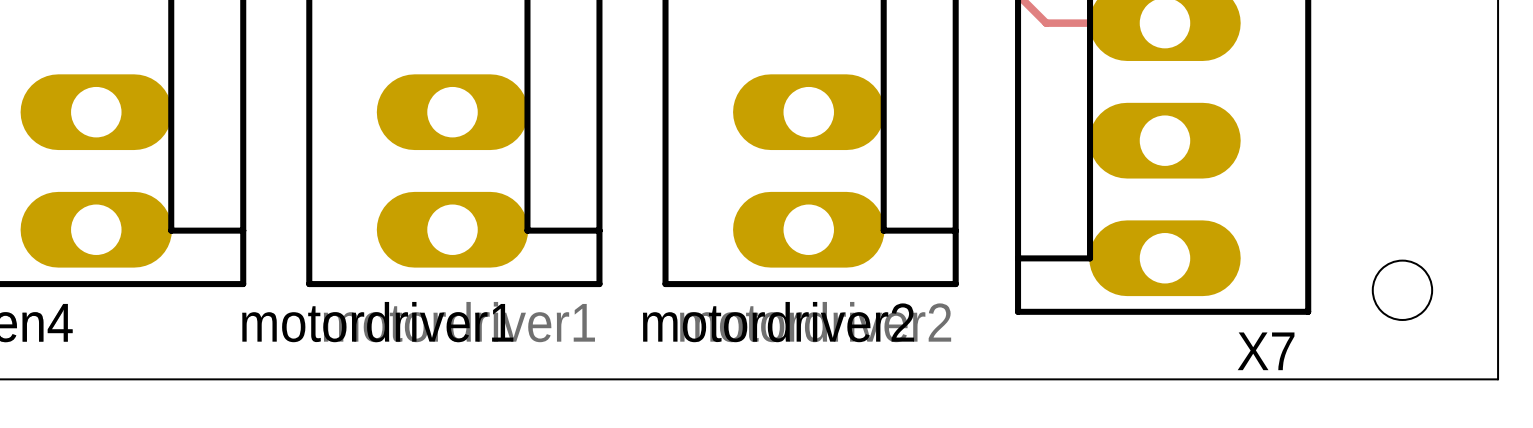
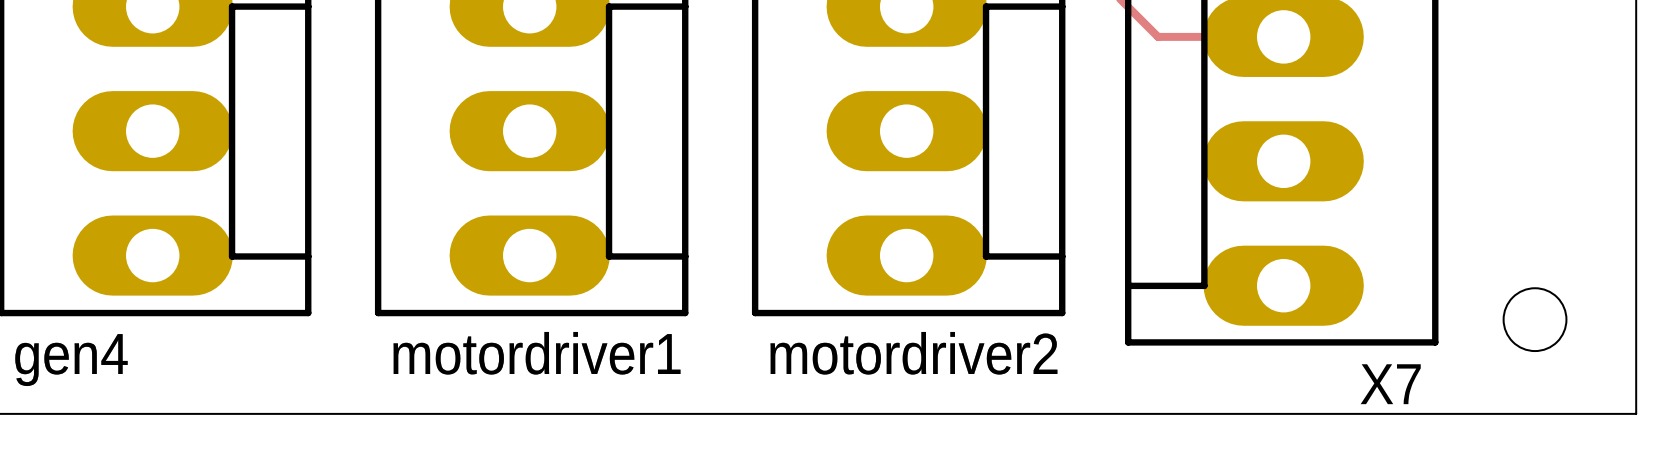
text position: motordriver1 (377, 322) -> motordriver1 (537, 353)
text position: motordriver2 (778, 322) -> motordriver2 (913, 353)

